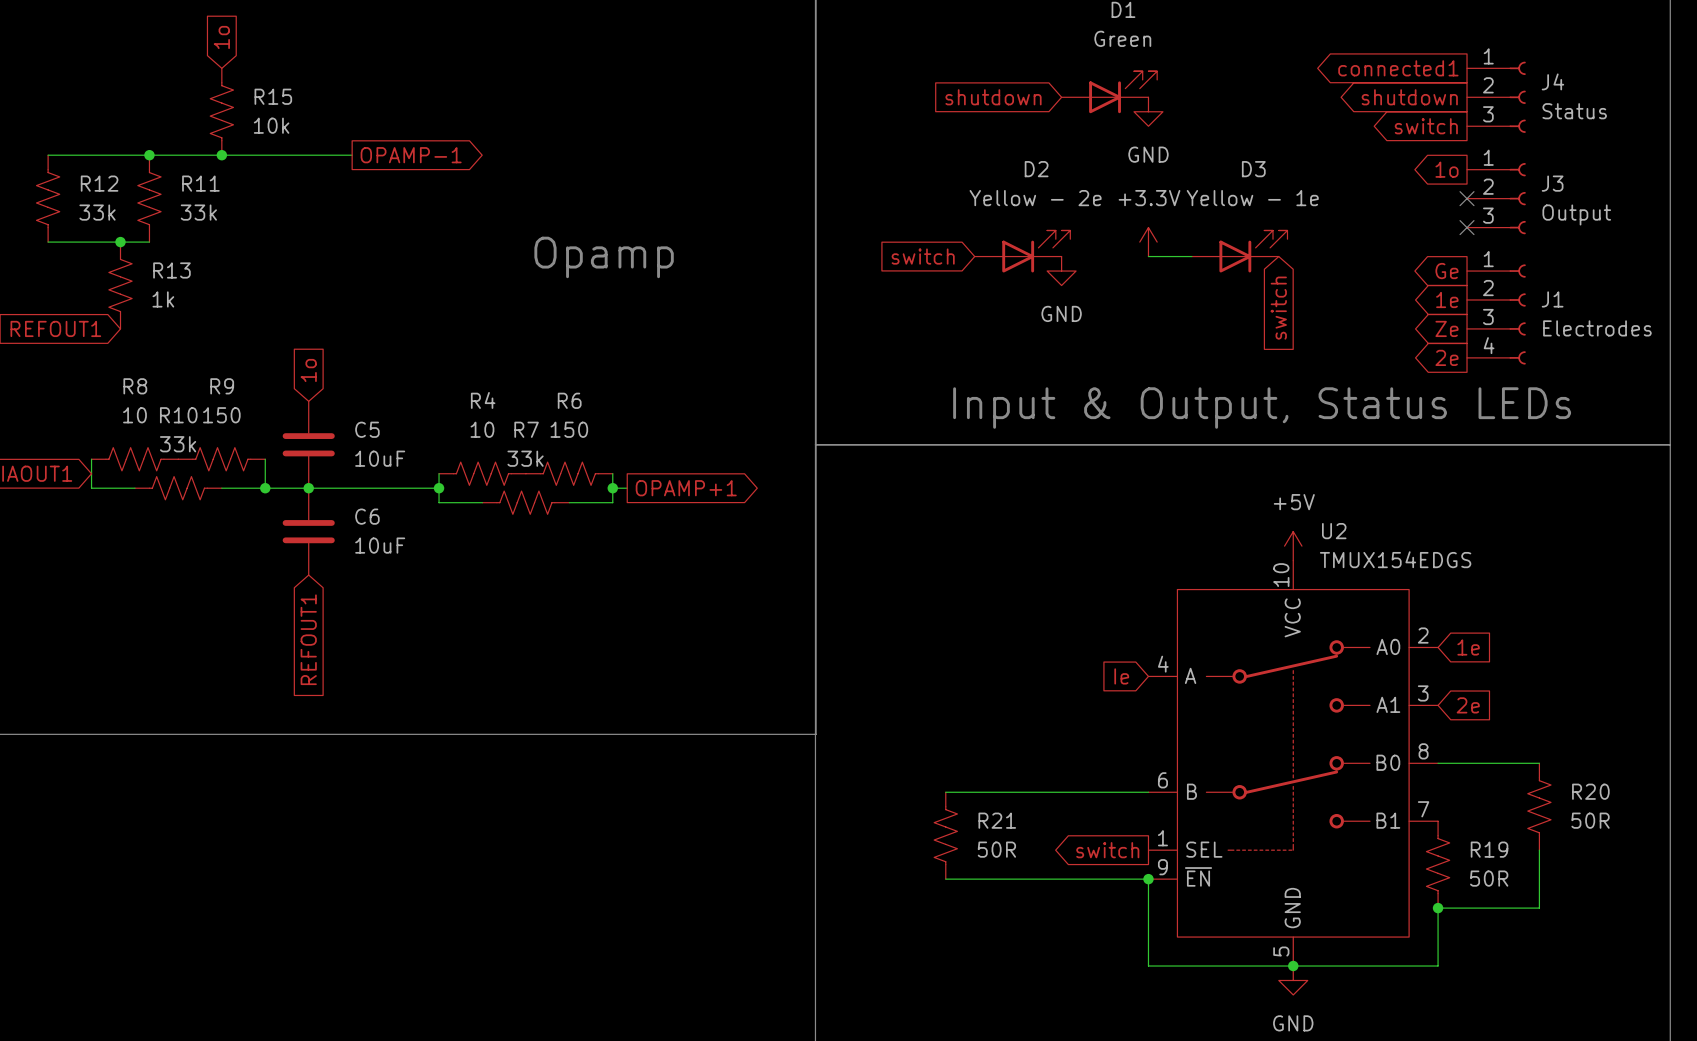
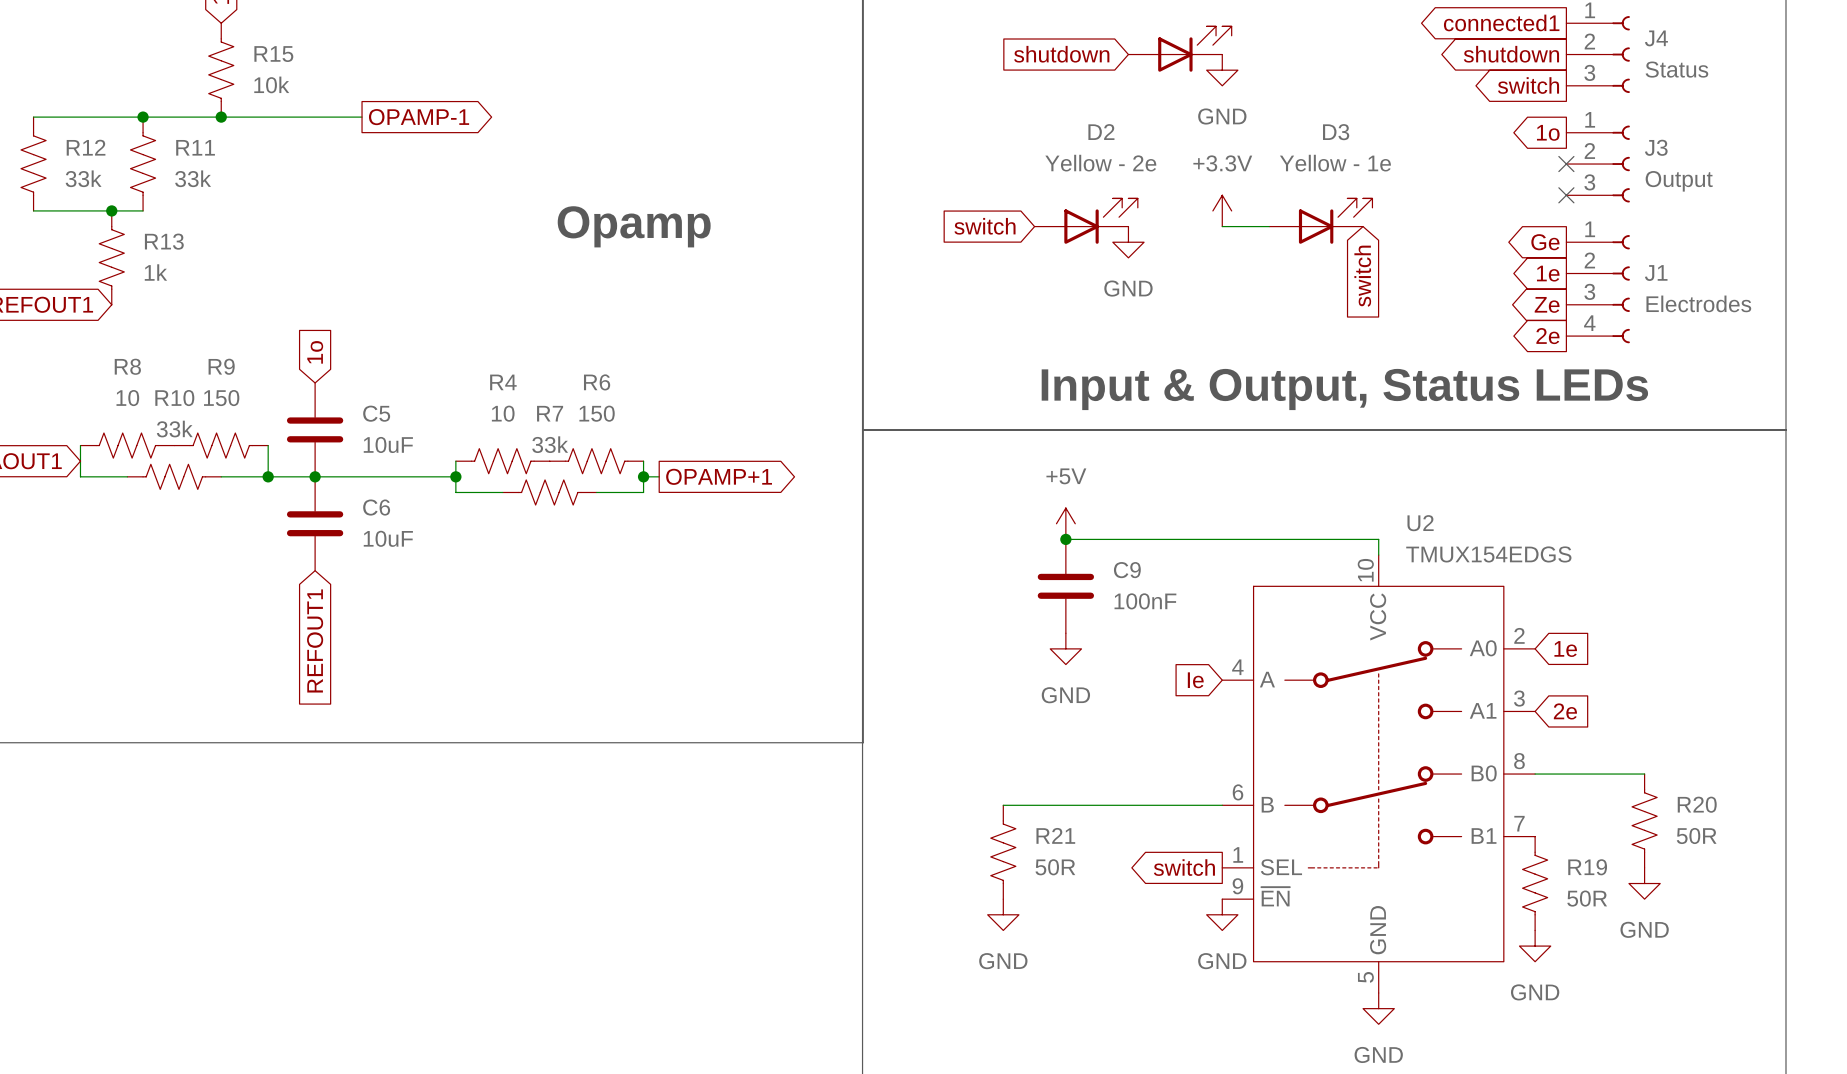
power symbol: none -> +5V (1065, 523)
wire: none -> (1065, 539) (1378, 539) (1378, 555)
junction: none -> (1065, 539)
power symbol: +5V (1293, 546) -> none
C9: none -> 100nF (1065, 586)
power symbol: none -> GND (1065, 648)
wire: (1539, 850) (1539, 908) (1438, 908) (1438, 966) (1148, 966) (1148, 879) (945, 879) -> none
power symbol: none -> GND (1644, 883)
junction: (1148, 879) -> none
power symbol: none -> GND (1003, 914)
power symbol: none -> GND (1222, 914)
junction: (1438, 908) -> none
power symbol: none -> GND (1535, 946)
junction: (1293, 966) -> none

